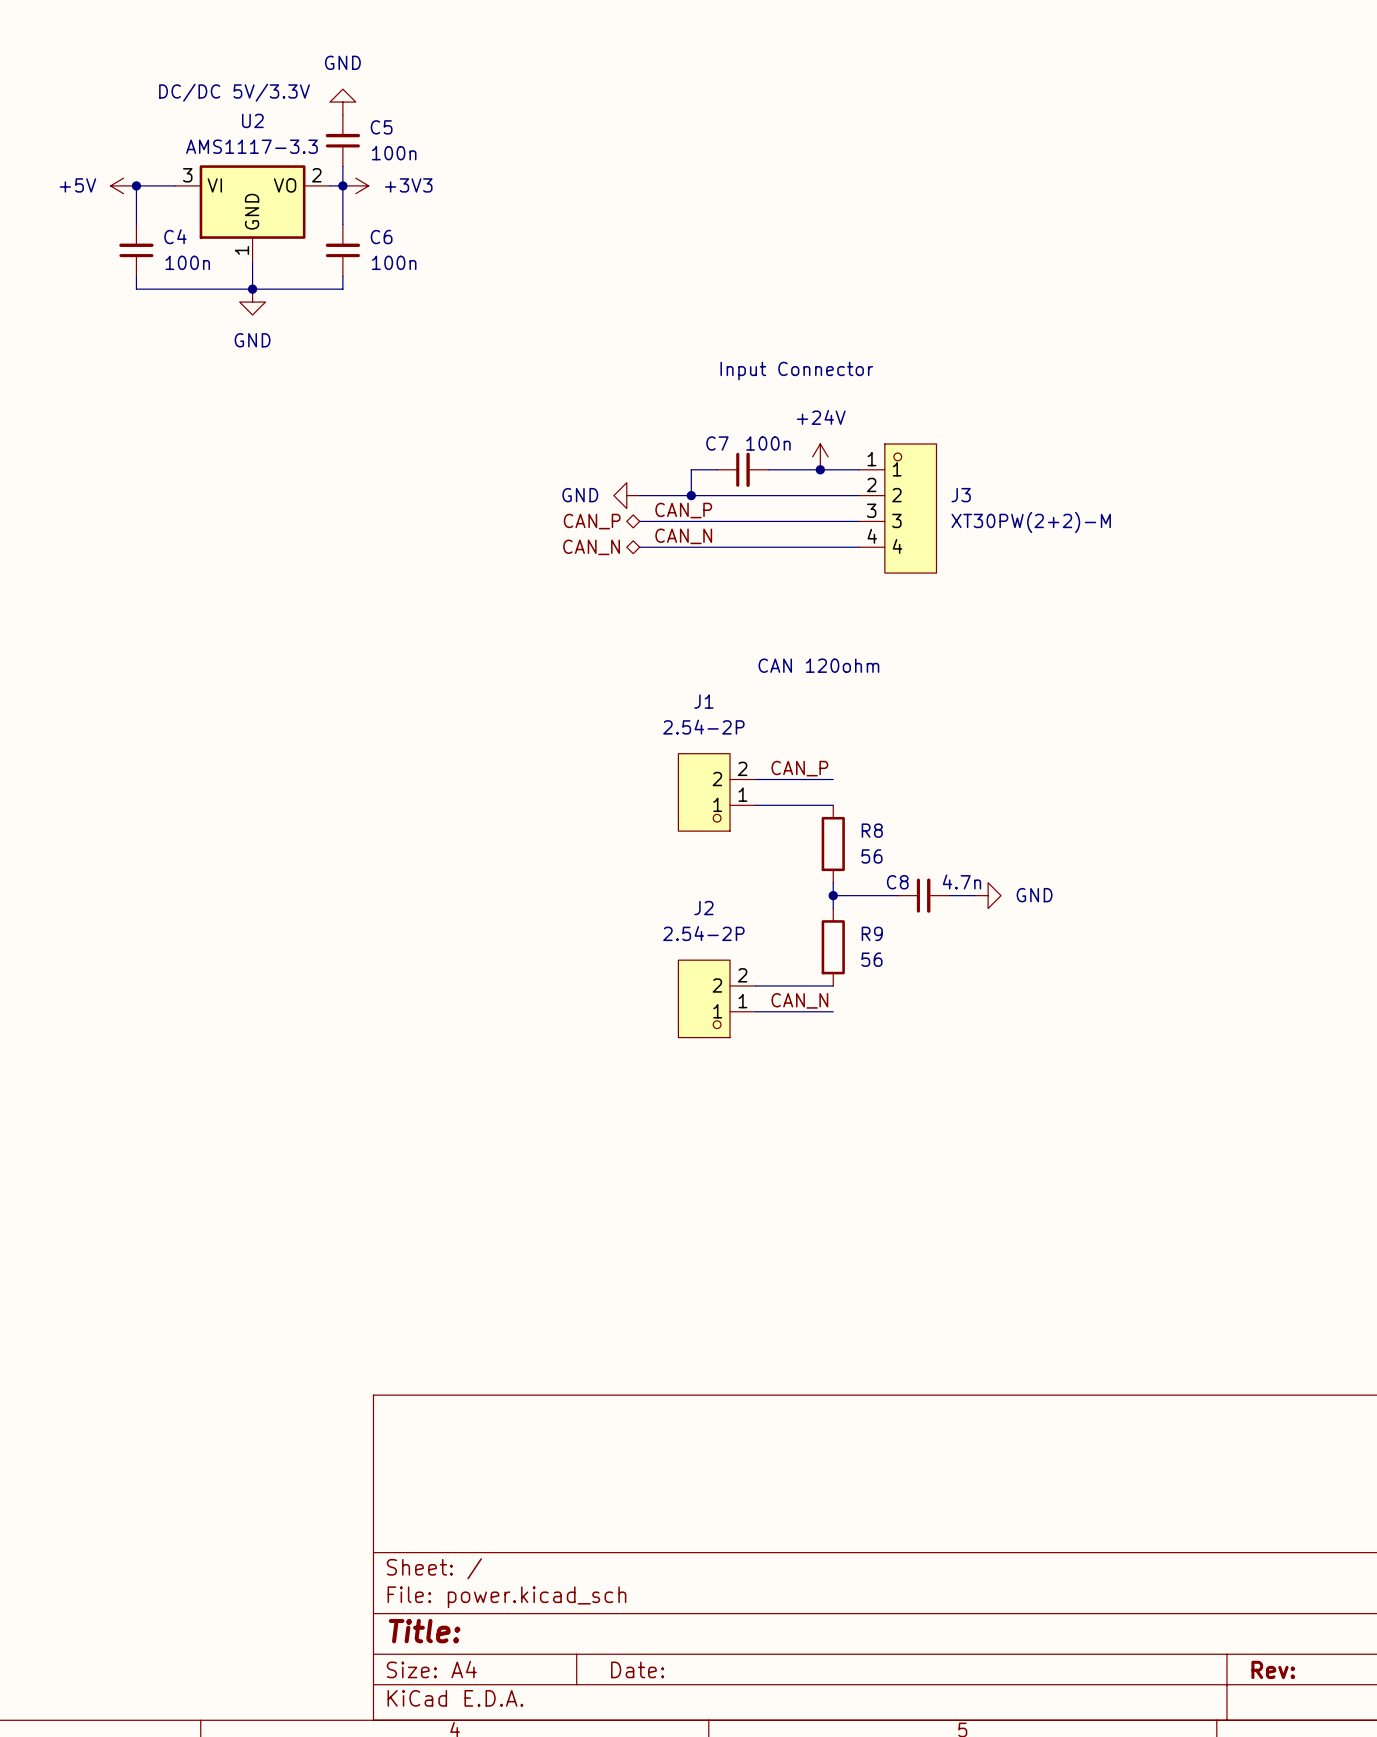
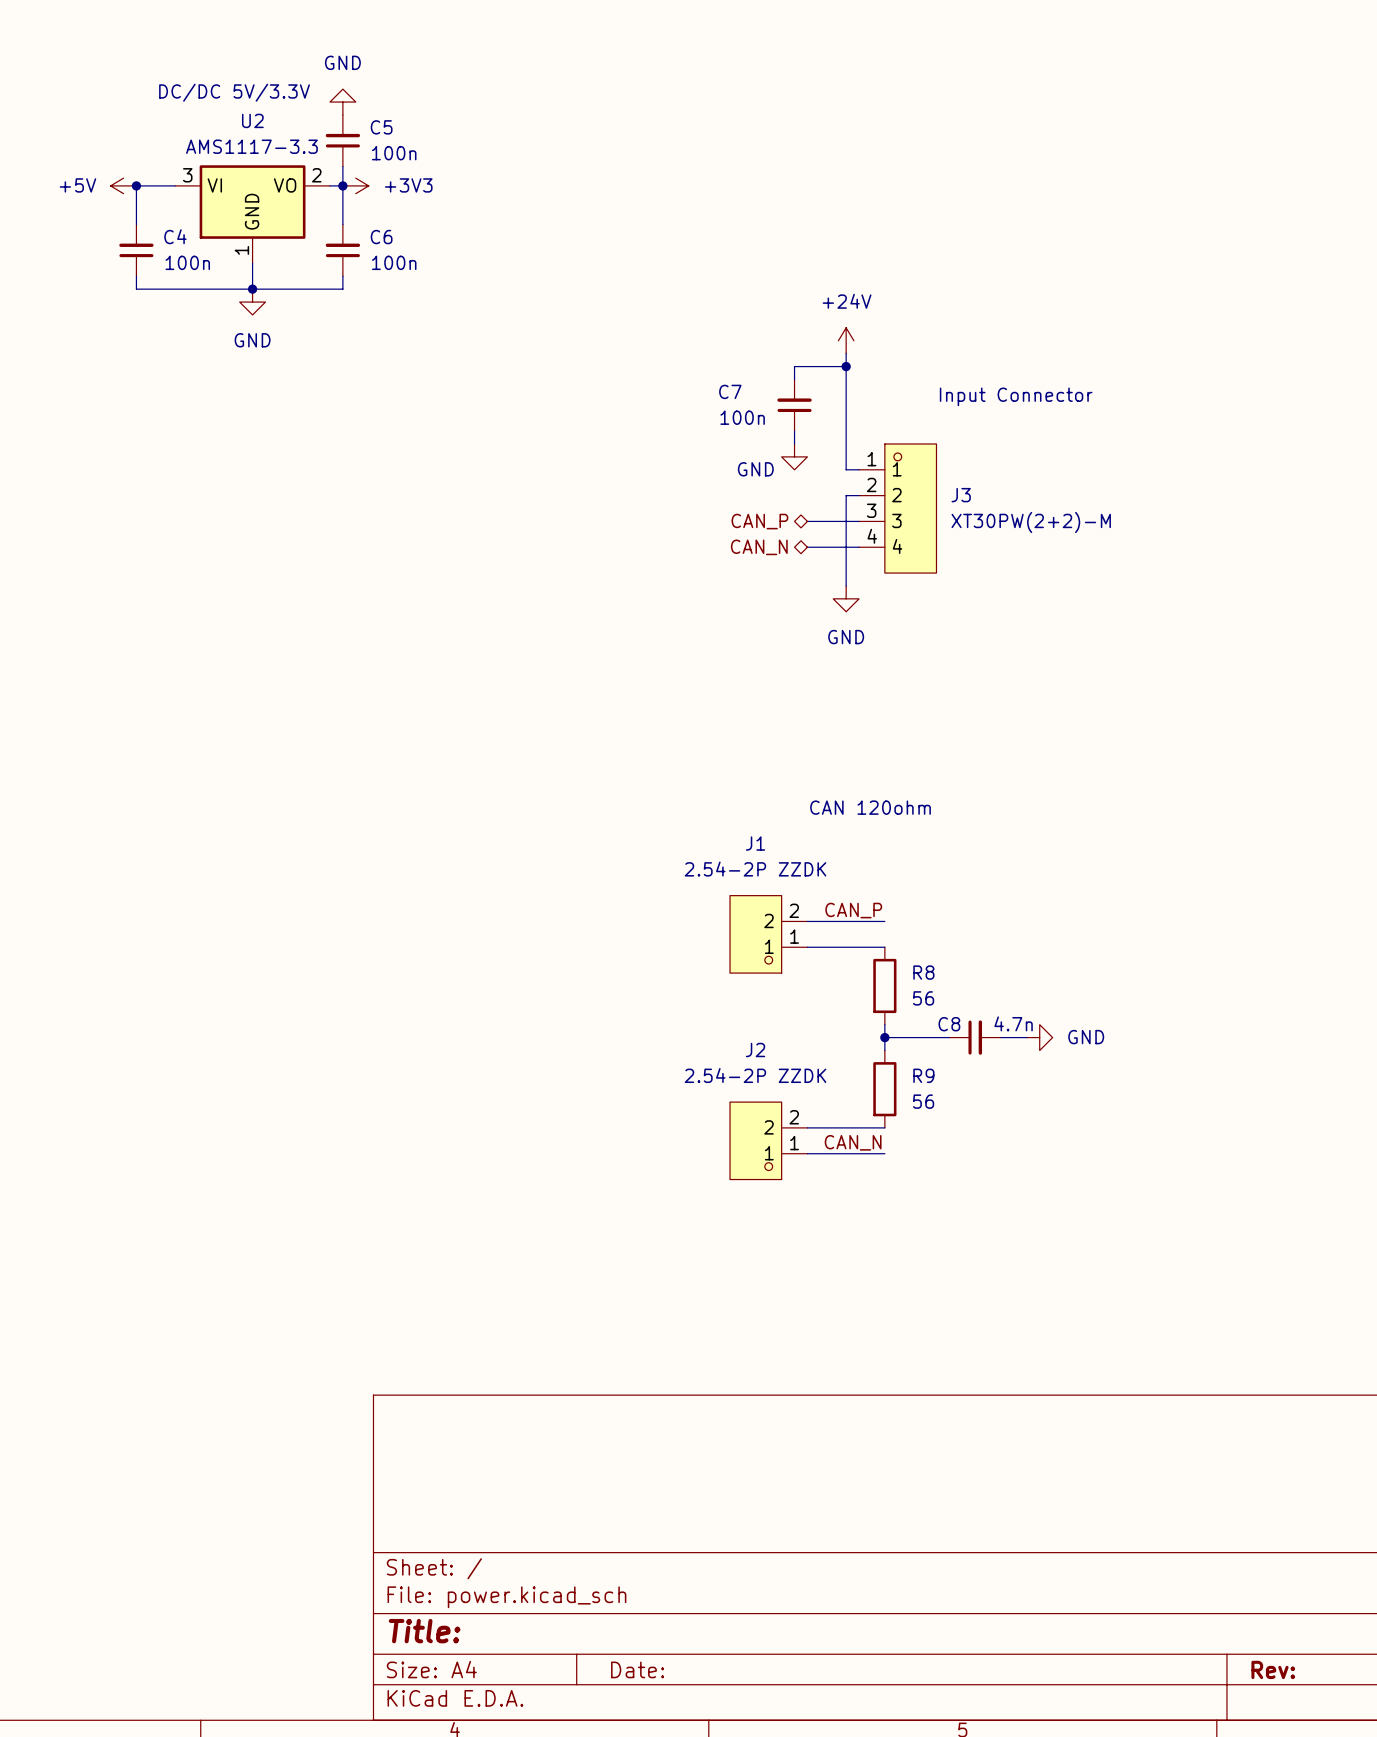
wire: none -> (846, 366) (794, 366) (794, 379)
junction: none -> (846, 366)
text position: Input Connector (796, 371) -> Input Connector (1016, 396)
wire: none -> (794, 431) (794, 444)
C7 name position: C7 (717, 443) -> C7 (730, 391)
C7 value position: 100n (768, 443) -> 100n (742, 417)
power symbol: none -> GND (794, 456)
power symbol position: +24V (820, 456) -> +24V (846, 340)
wire: (717, 469) (691, 469) (691, 495) -> none
C7 rotation: 0° (742, 469) -> 90° counterclockwise (794, 405)
C7 position: (742, 469) -> (794, 405)
wire: (768, 469) (846, 469) -> (846, 353) (846, 469)
junction: (820, 469) -> none
power symbol: GND (626, 495) -> none
wire: (639, 495) (846, 495) -> (846, 585) (846, 495)
junction: (691, 495) -> none
label: CAN_P (683, 510) -> none
hierarchical label position: CAN_P (592, 521) -> CAN_P (759, 521)
wire: (639, 521) (807, 521) -> none
label: CAN_N (683, 536) -> none
hierarchical label position: CAN_N (591, 547) -> CAN_N (759, 547)
wire: (639, 547) (807, 547) -> none
power symbol: none -> GND (846, 598)
text position: CAN 120ohm (818, 665) -> CAN 120ohm (870, 807)
J1 value: 2.54-2P (703, 727) -> 2.54-2P ZZDK (755, 869)
label position: CAN_P (799, 768) -> CAN_P (853, 910)
wire: (755, 779) (833, 779) -> (807, 921) (884, 921)
J1 position: (717, 792) -> (768, 934)
wire: (755, 805) (833, 805) -> (807, 947) (884, 947)
R8 position: (833, 844) -> (884, 985)
wire: (833, 882) (833, 908) -> (884, 1024) (884, 1050)
wire: (833, 895) (897, 895) -> (884, 1037) (949, 1037)
junction: (833, 895) -> none
C8 position: (923, 895) -> (975, 1037)
wire: (949, 895) (975, 895) -> (1001, 1037) (1026, 1037)
power symbol position: GND (988, 895) -> GND (1039, 1037)
J2 value: 2.54-2P (703, 933) -> 2.54-2P ZZDK (755, 1075)
R9 position: (833, 947) -> (884, 1089)
wire: (755, 985) (833, 985) -> (807, 1127) (884, 1127)
J2 position: (717, 998) -> (768, 1140)
label position: CAN_N (799, 1000) -> CAN_N (853, 1142)
wire: (755, 1011) (833, 1011) -> (807, 1153) (884, 1153)
junction: none -> (884, 1037)

